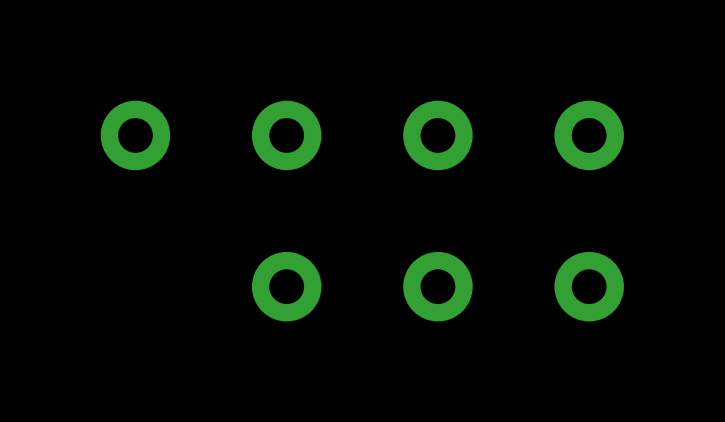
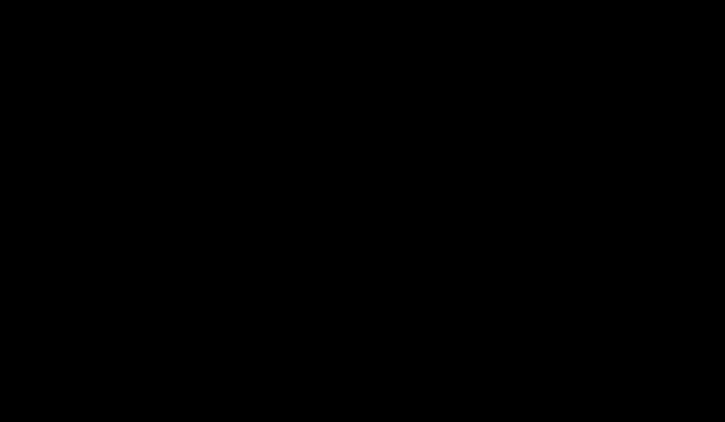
part: (135, 135) -> none
part: (286, 135) -> none
part: (437, 135) -> none
part: (589, 135) -> none
part: (286, 286) -> none
part: (437, 286) -> none
part: (589, 286) -> none

